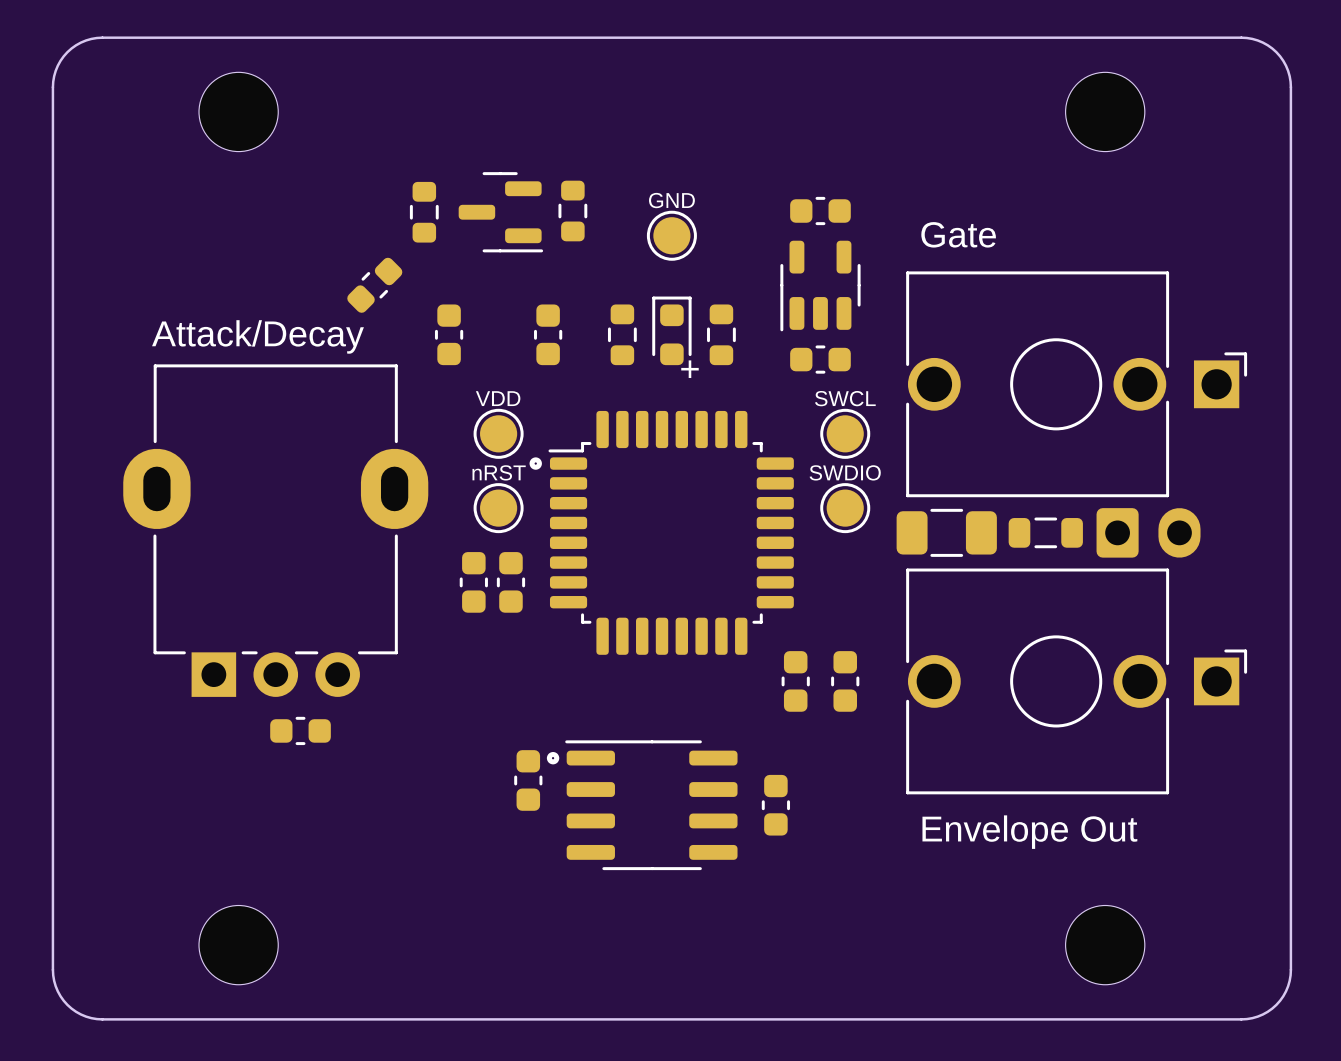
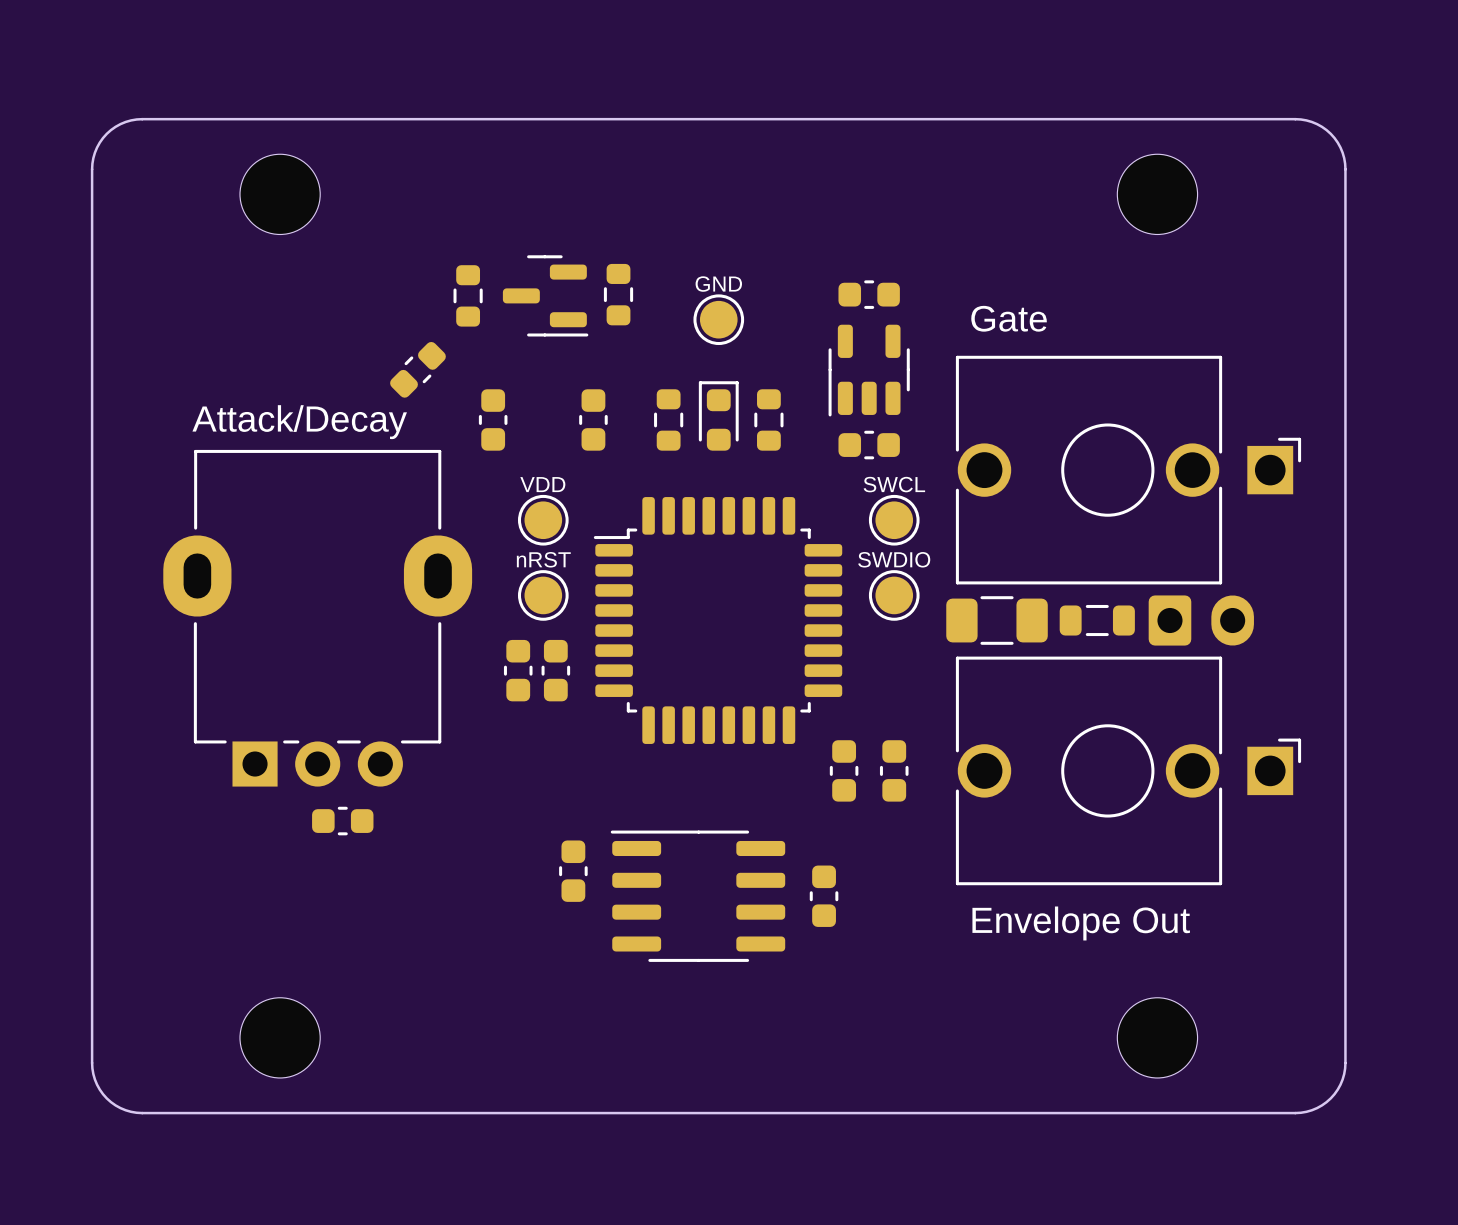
text: + (689, 369) -> none
drawing: [529, 457, 542, 470] -> none
drawing: [546, 751, 560, 765] -> none

